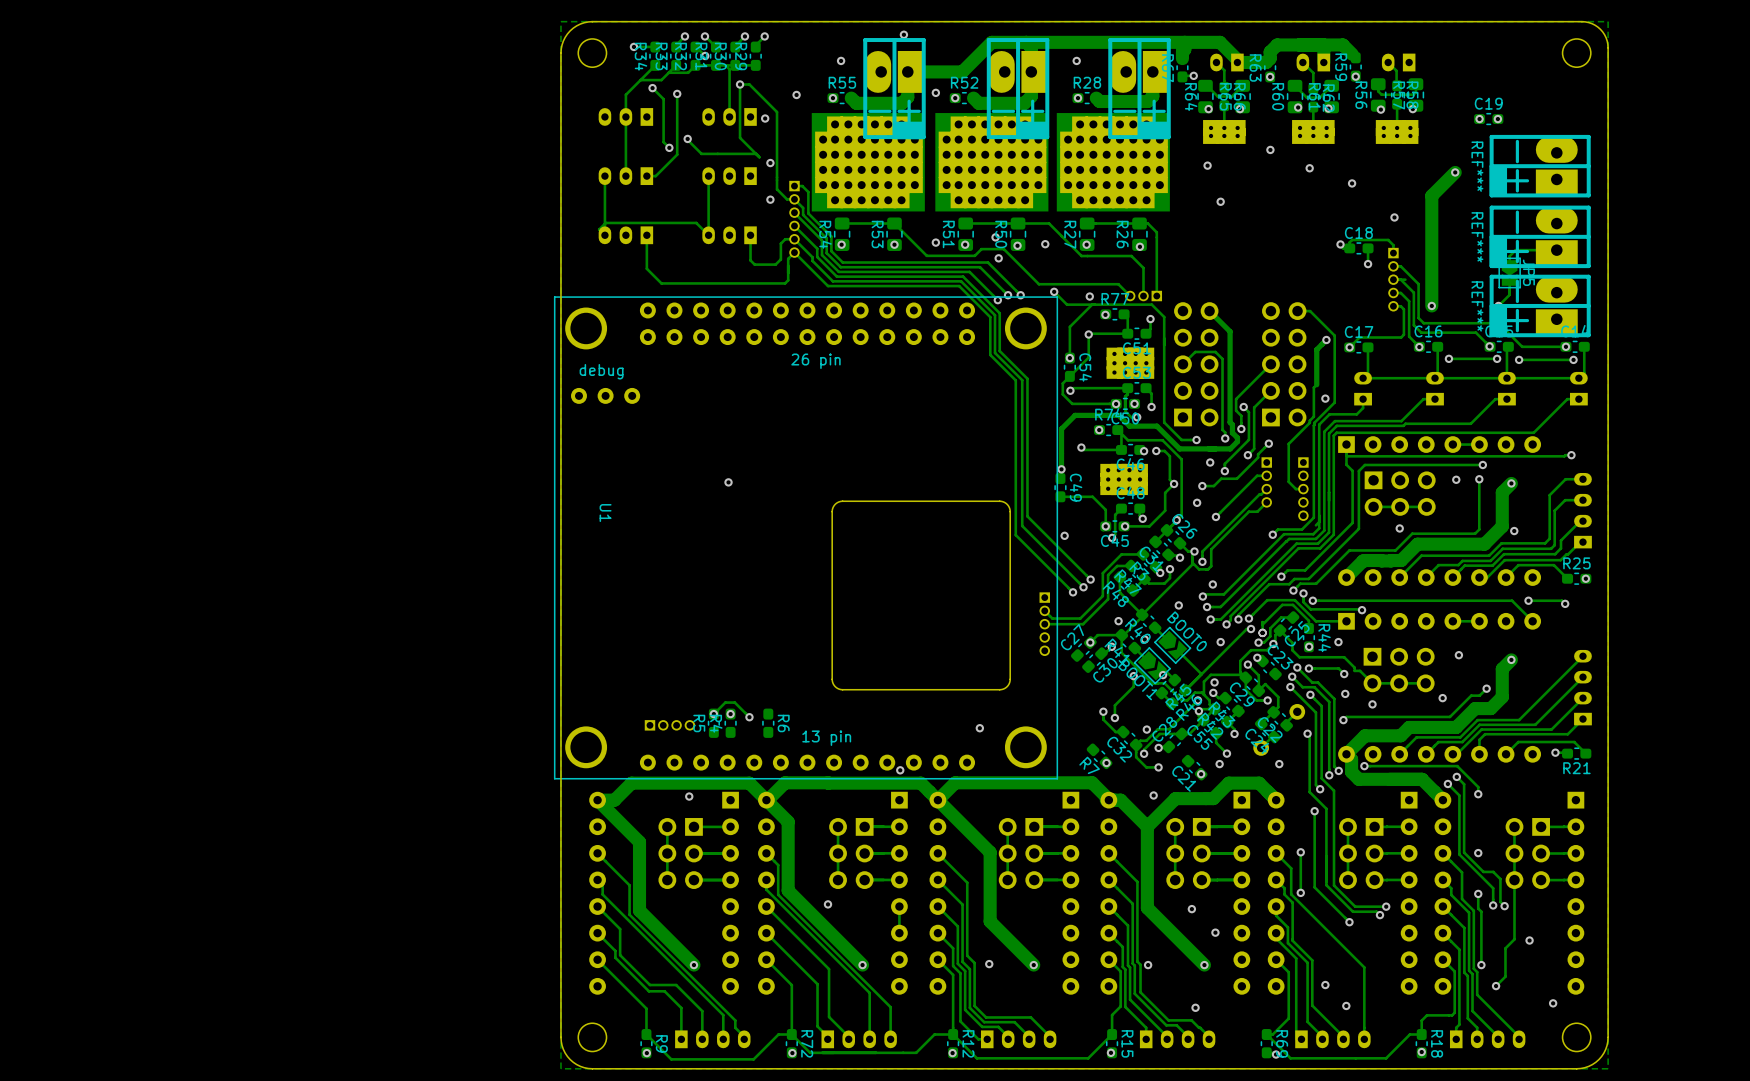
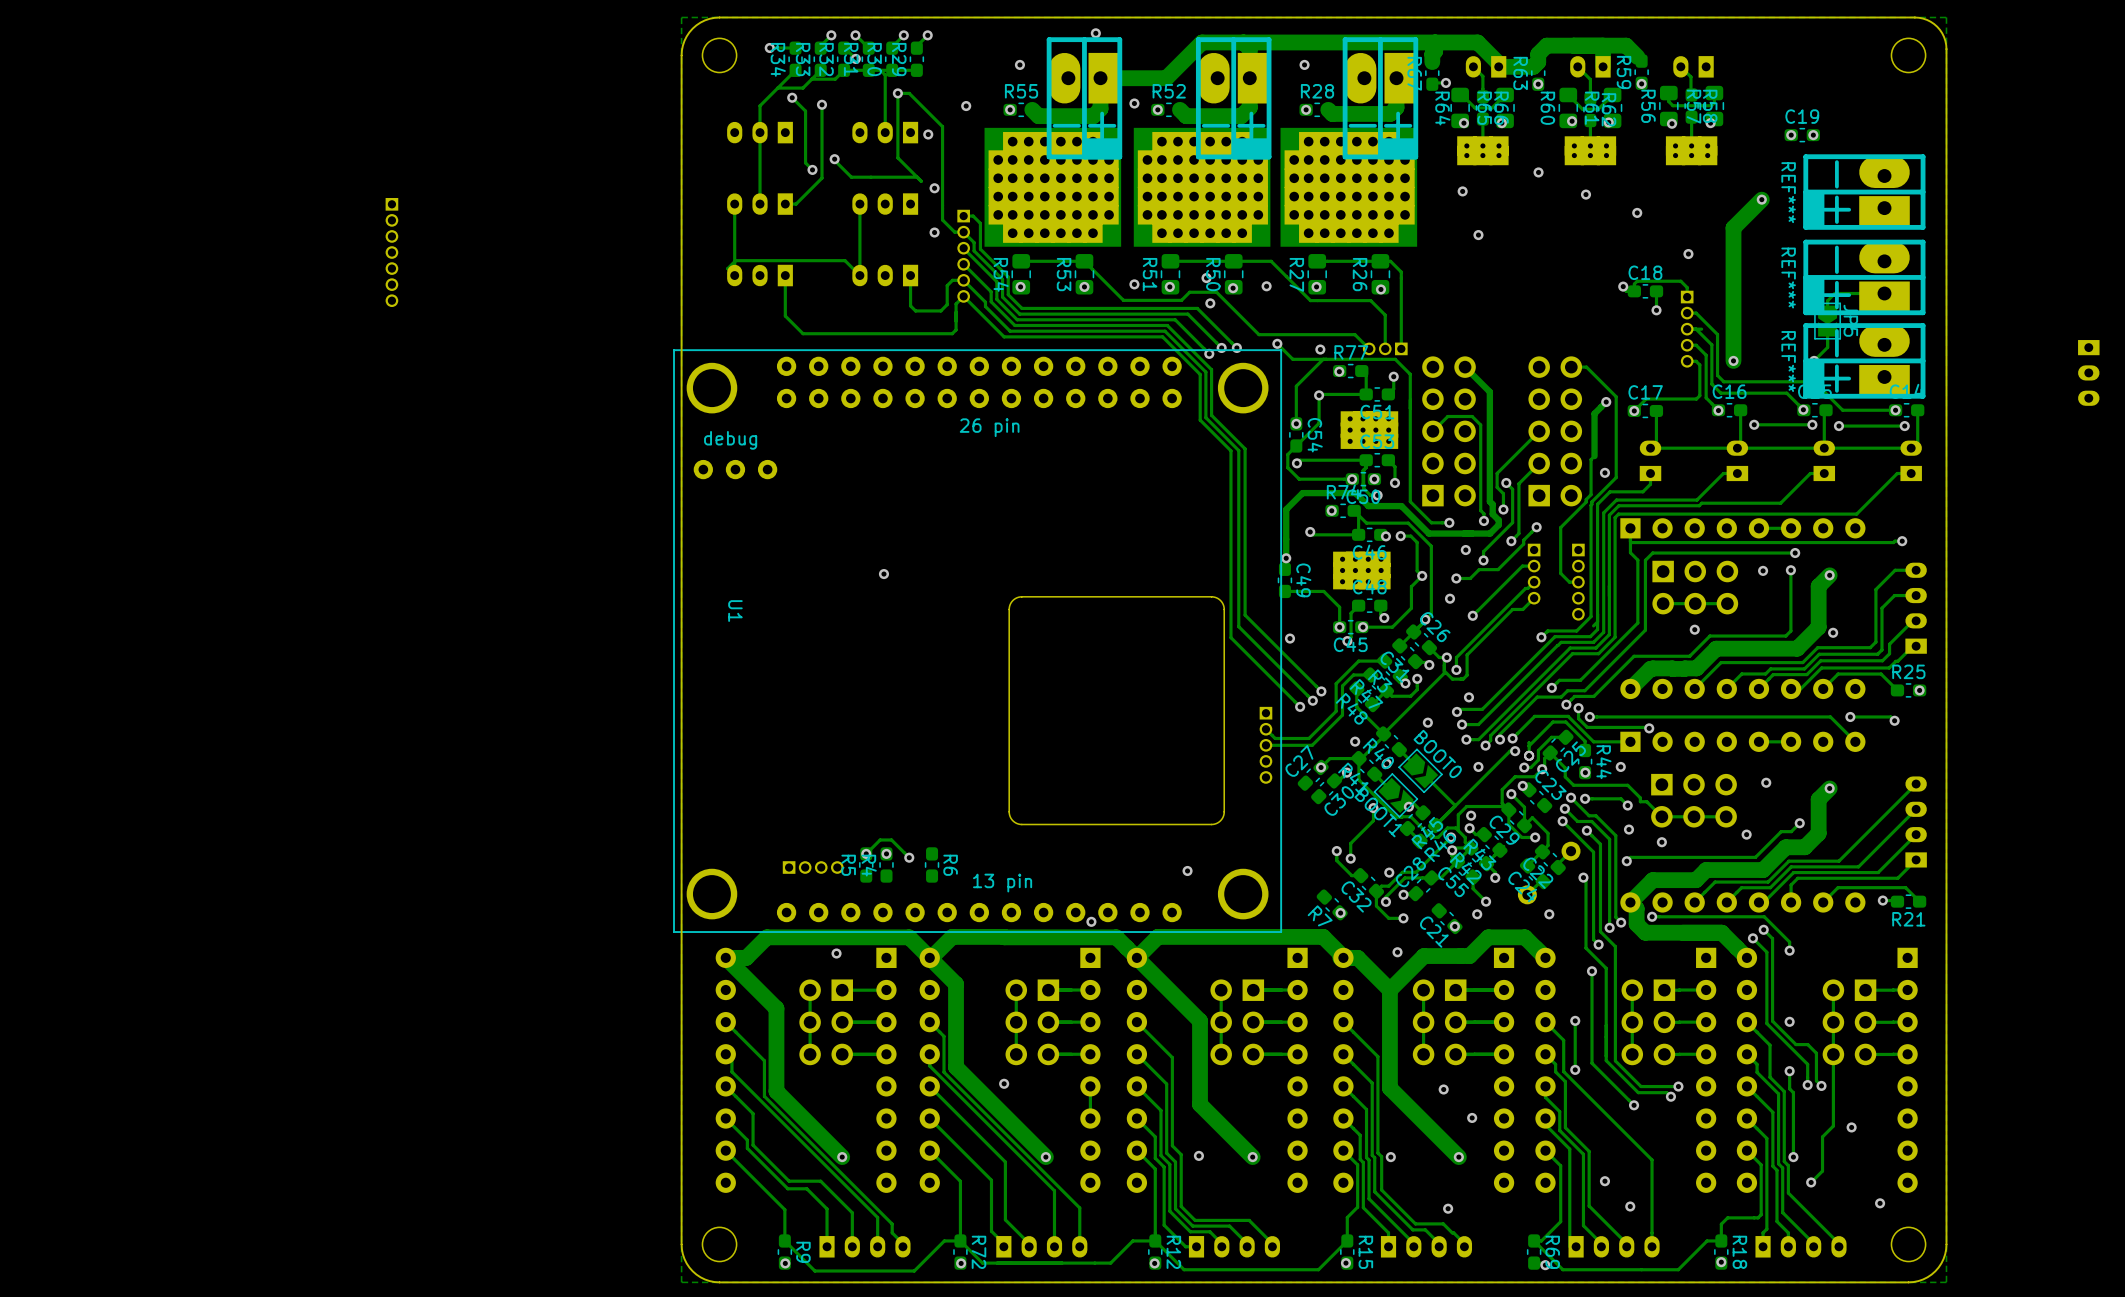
part: none -> (391, 252)
part: none -> (2088, 372)

